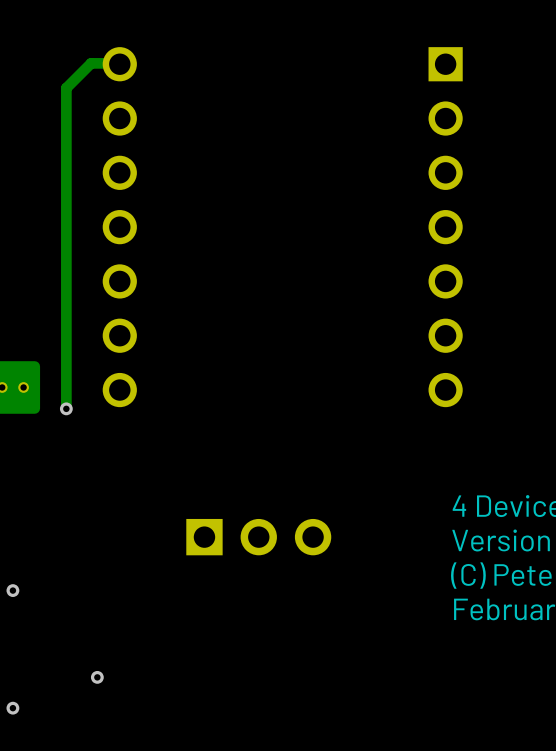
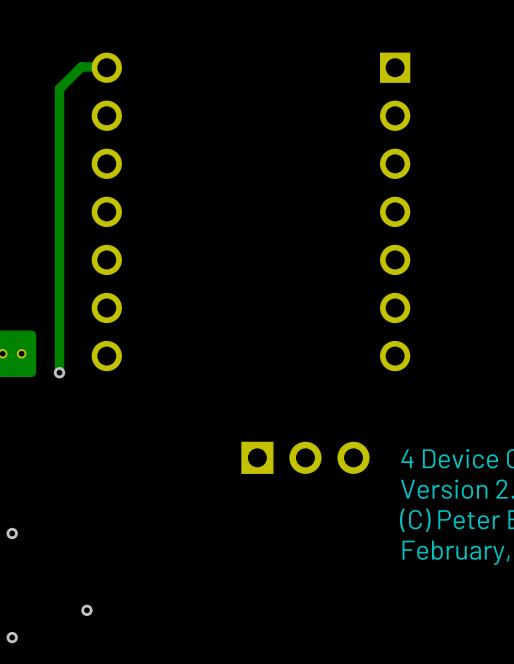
part position: (258, 537) -> (305, 457)

